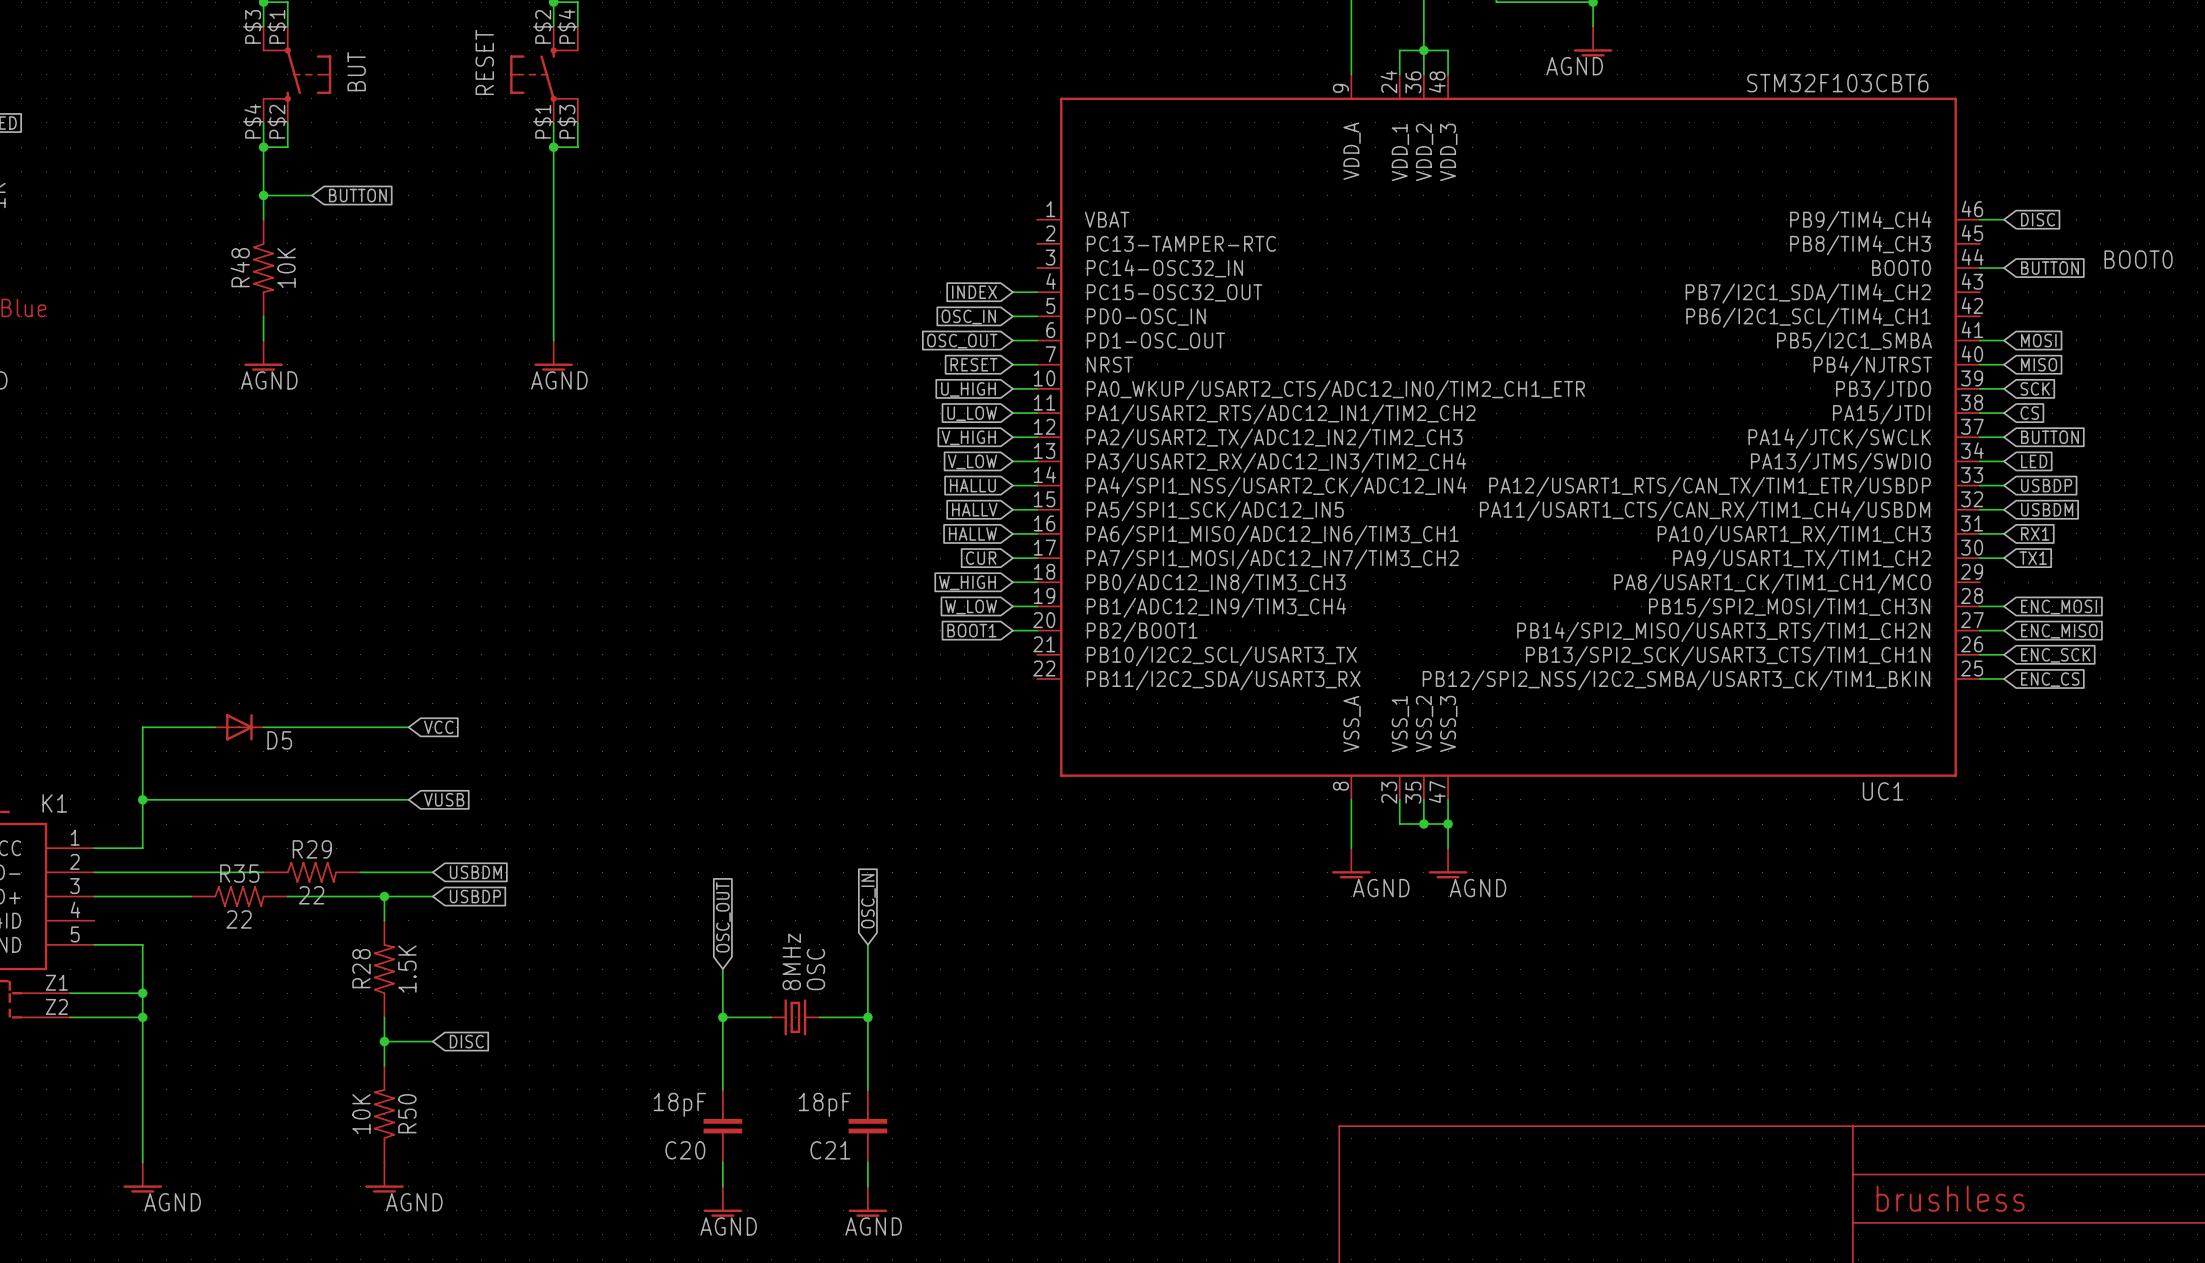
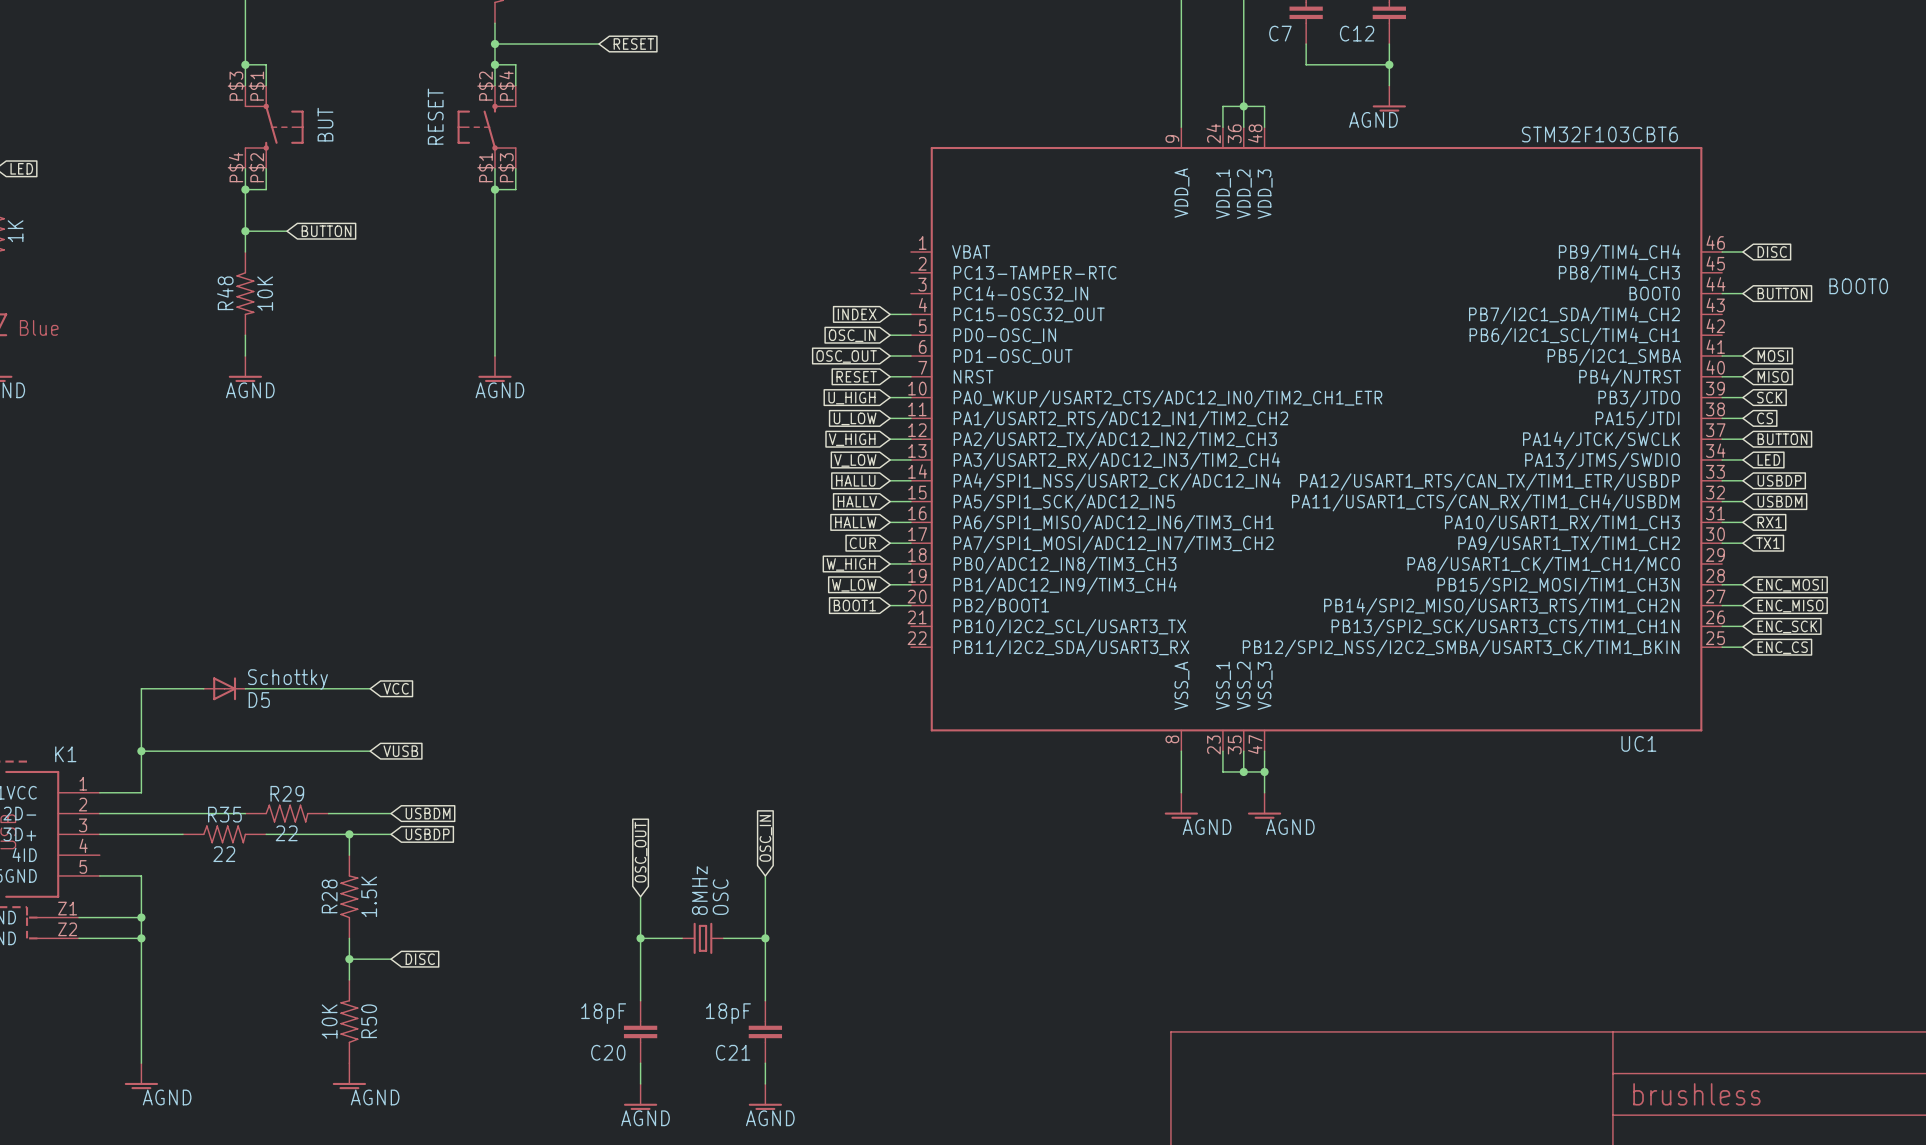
D5 value: none -> Schottky (287, 679)

